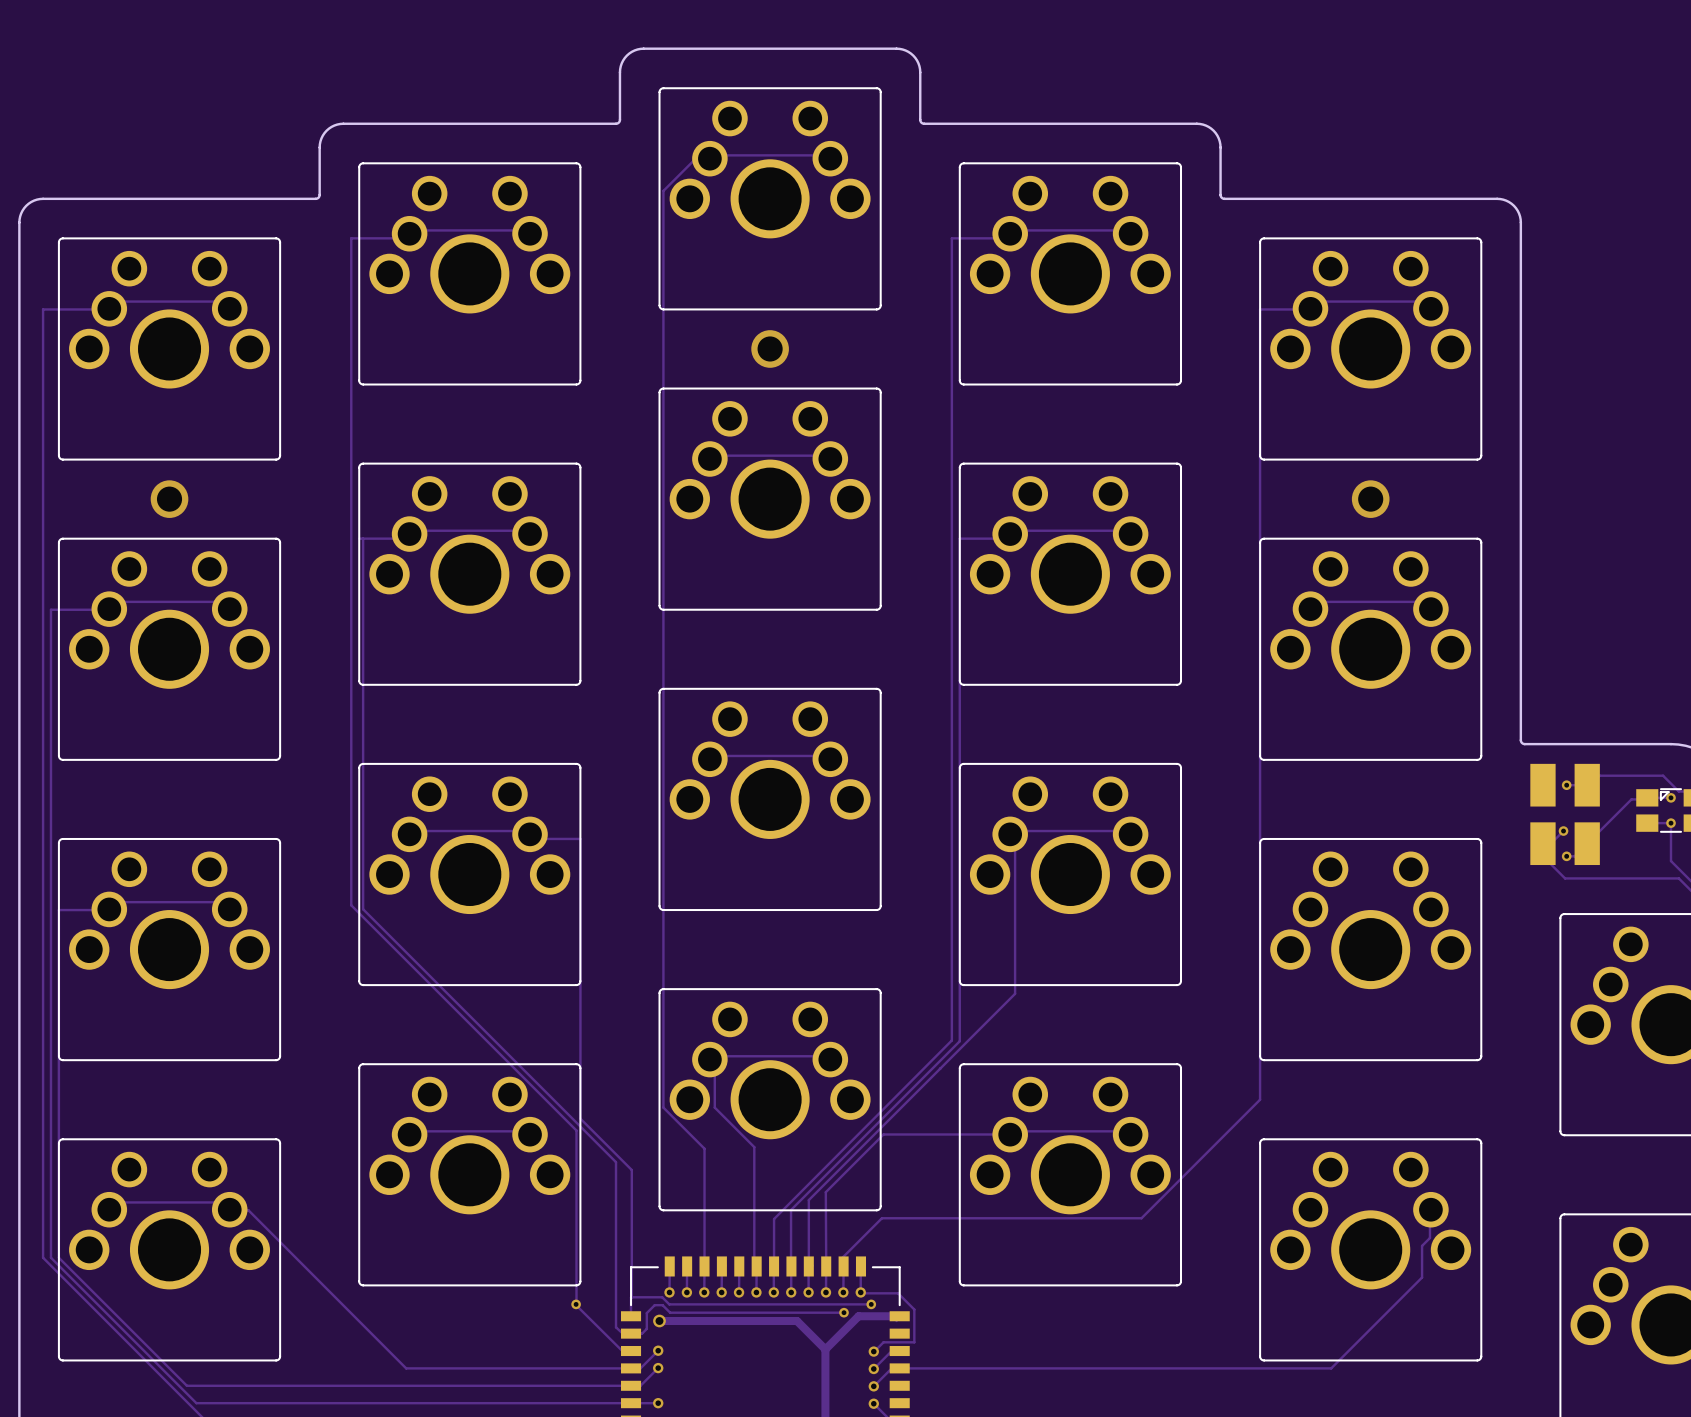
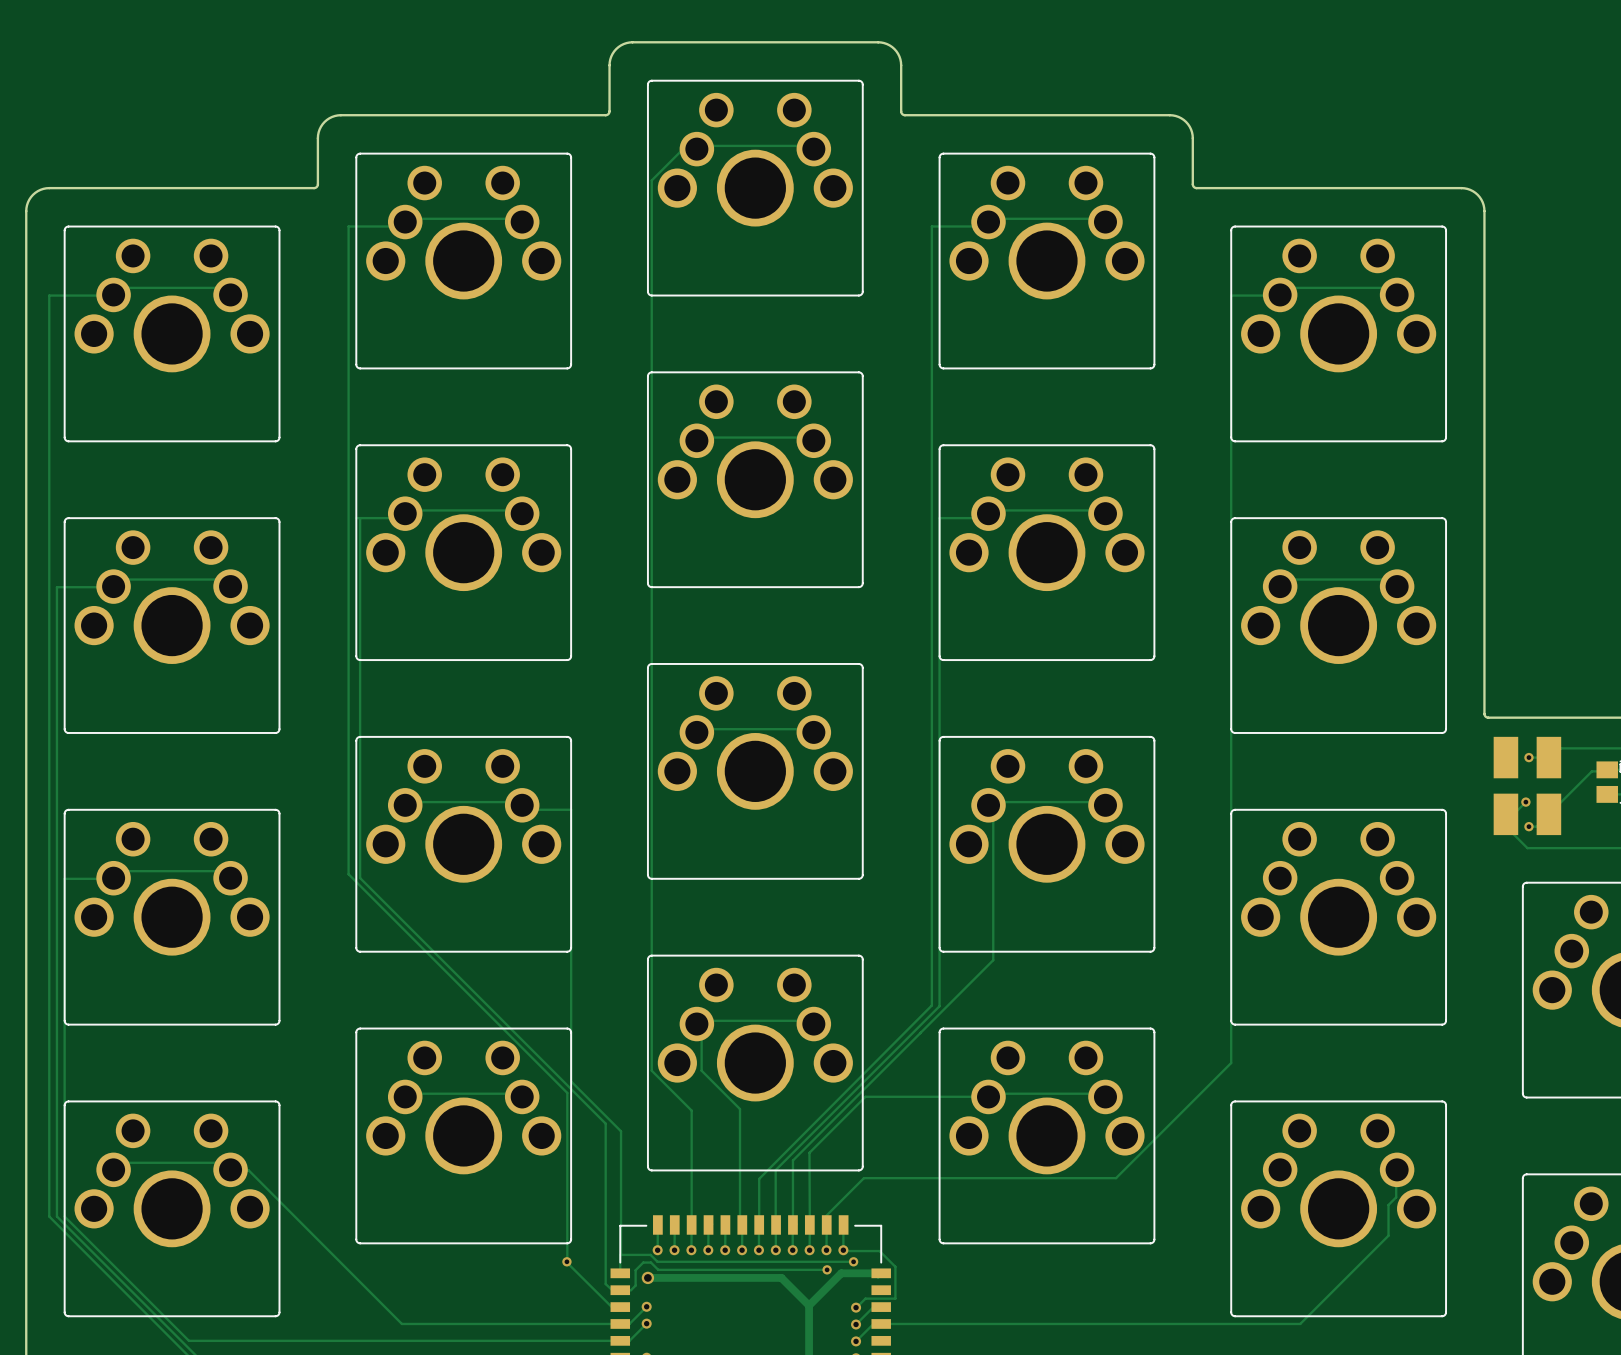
via: (770, 348) -> none
via: (169, 499) -> none
via: (1370, 499) -> none

